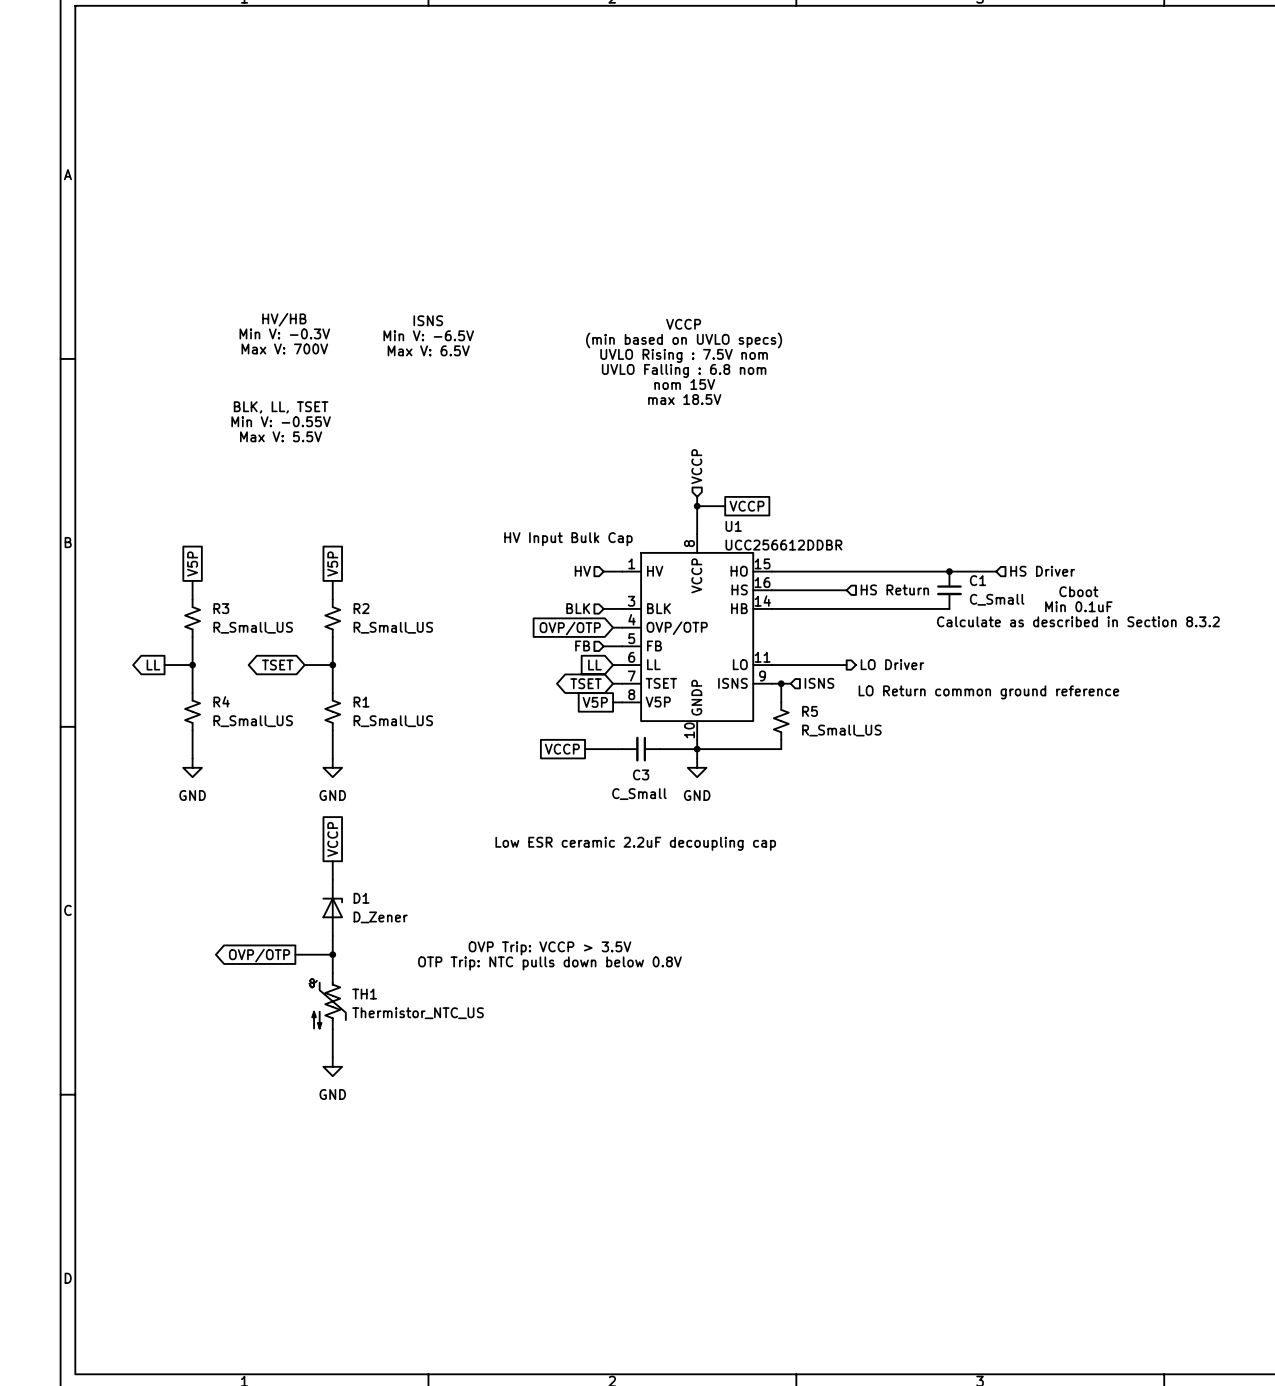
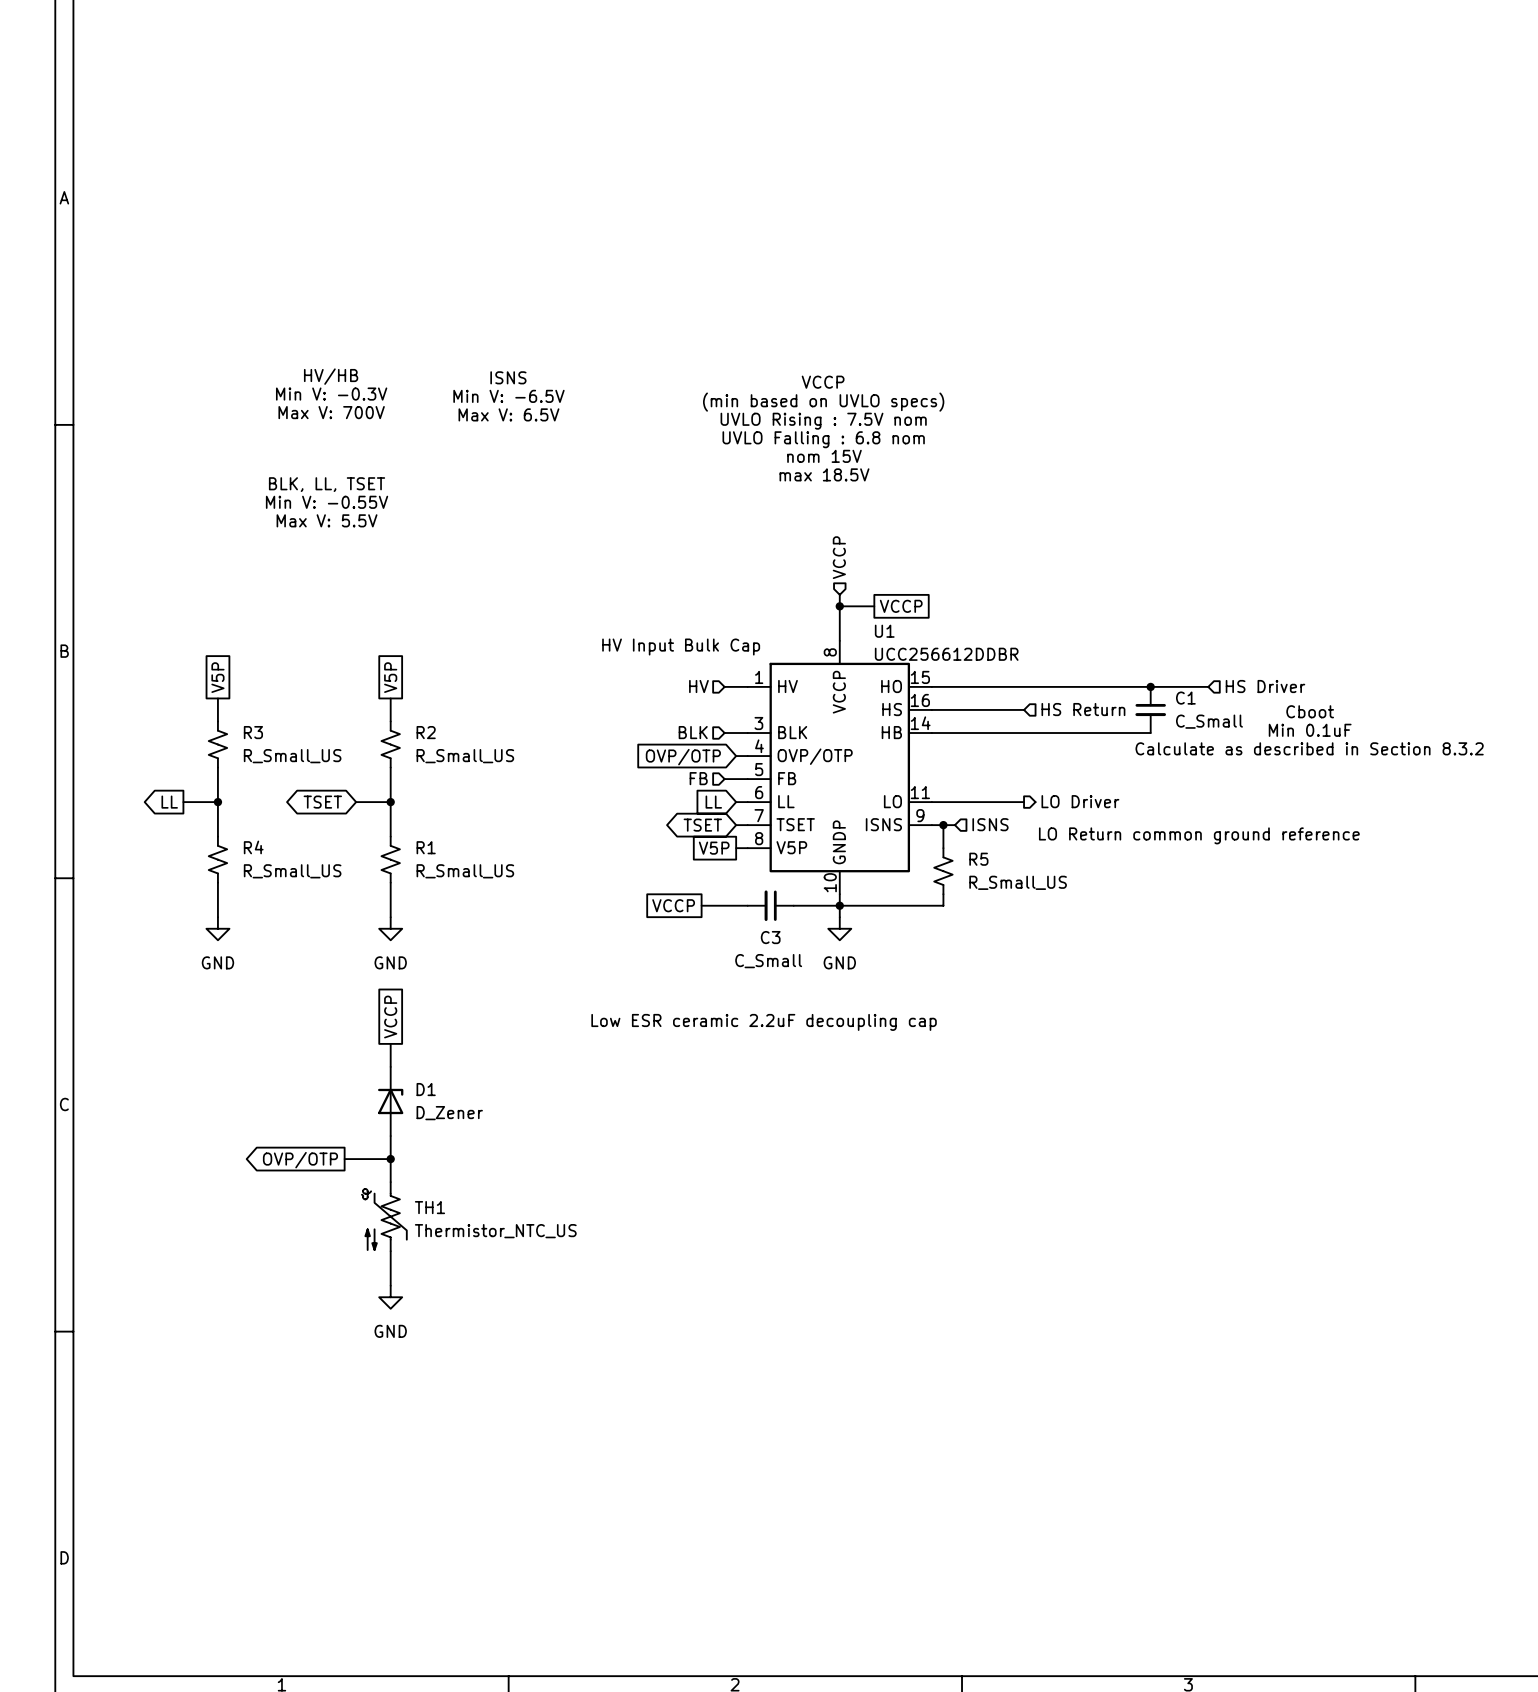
text: OVP Trip: VCCP > 3.5V (549, 948) -> none
text: OTP Trip: NTC pulls down below 0.8V (549, 963) -> none

